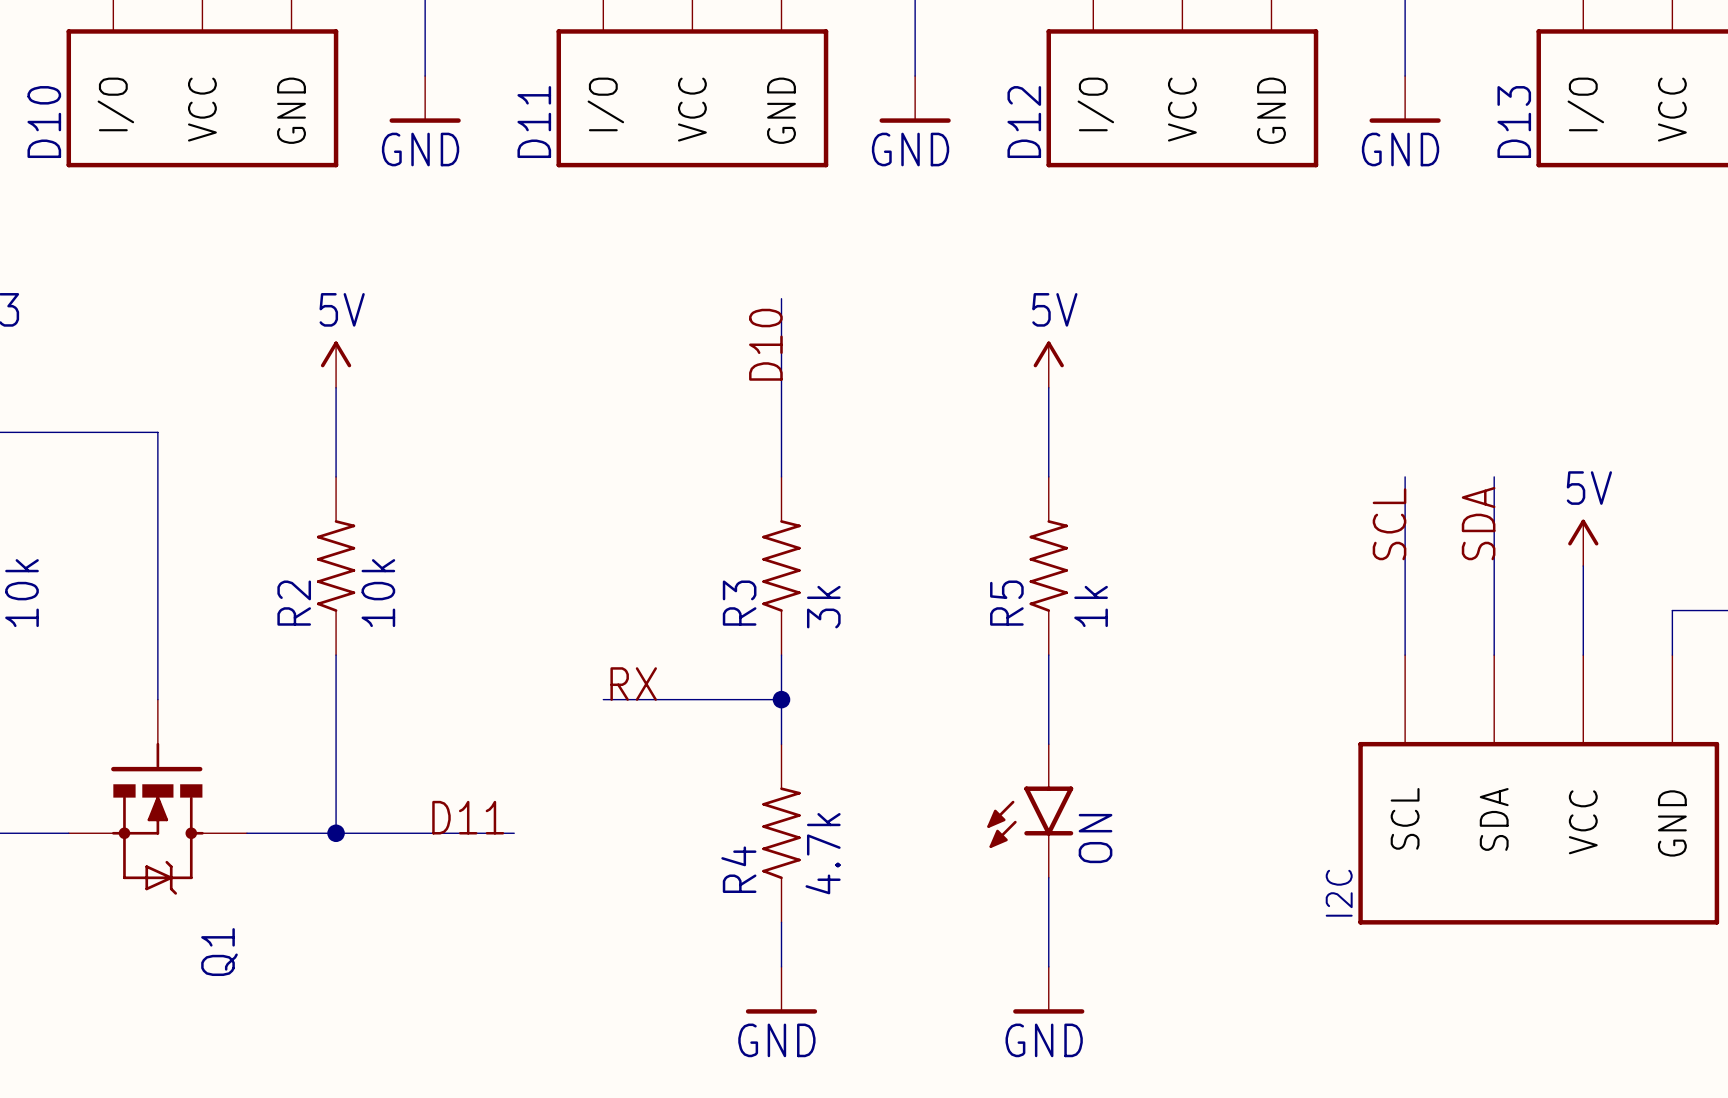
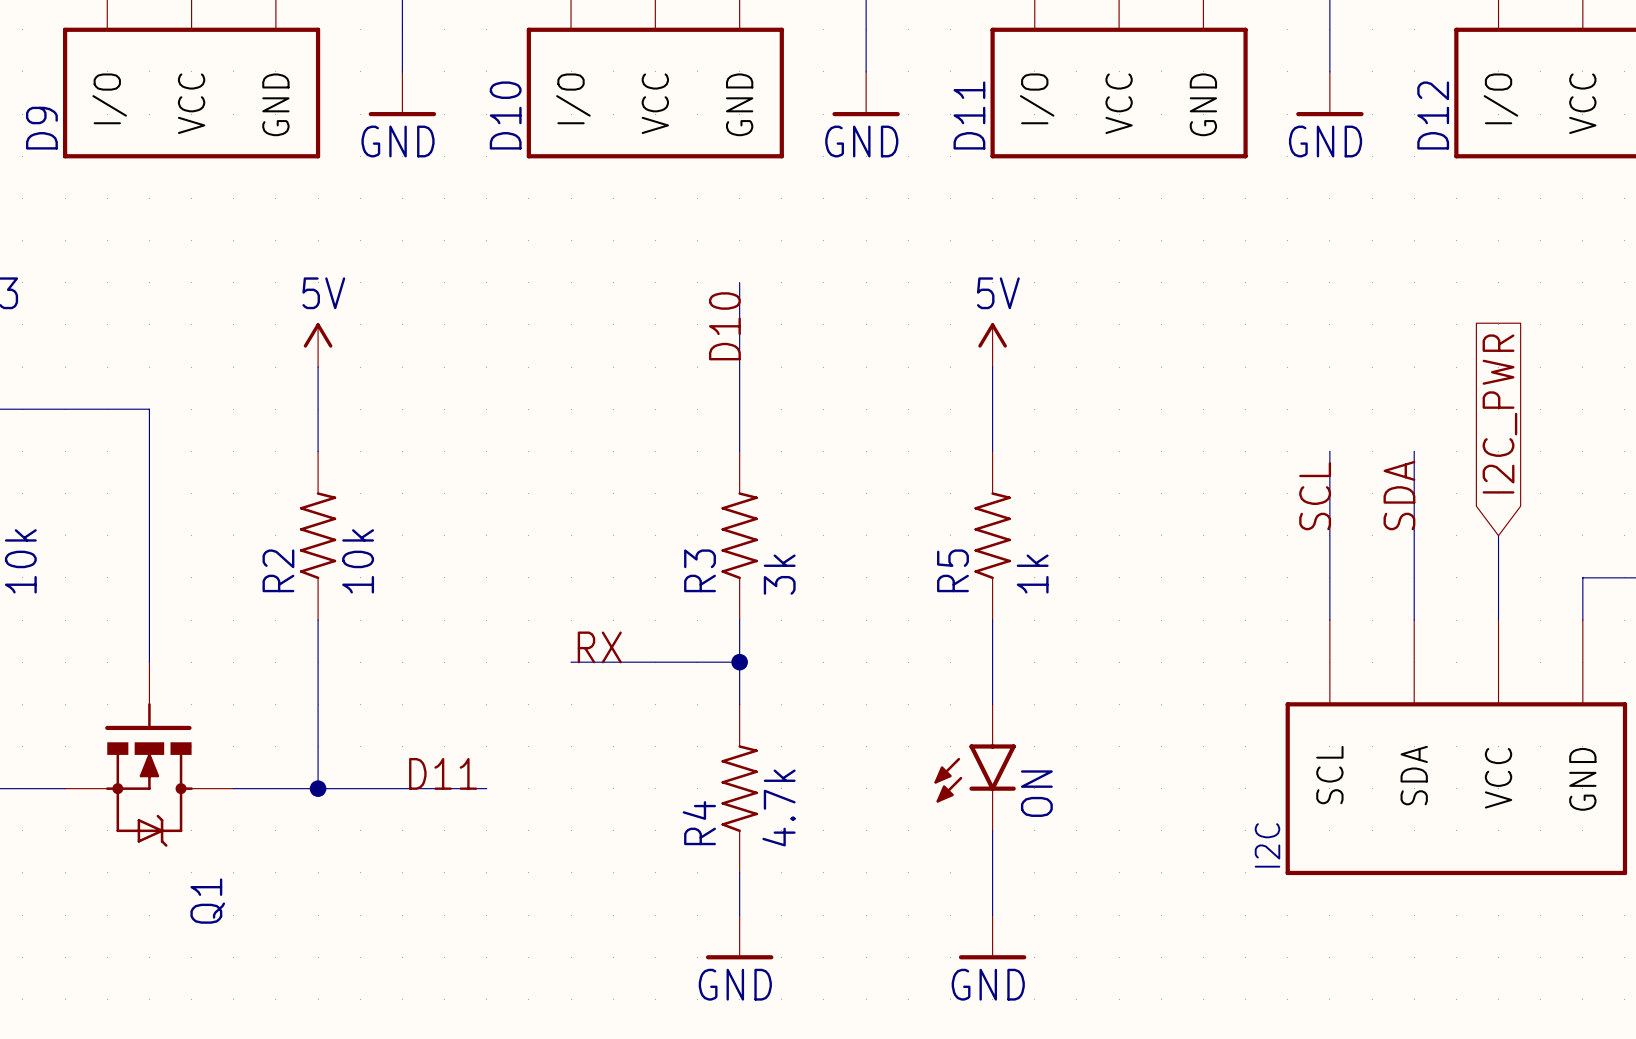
D10 name: D10 (44, 122) -> D9 (41, 128)
D11 name: D11 (534, 122) -> D10 (505, 115)
D12 name: D12 (1024, 122) -> D11 (969, 115)
D13 name: D13 (1514, 122) -> D12 (1433, 115)
global label: none -> I2C_PWR (1499, 413)
power symbol: 5V (1583, 542) -> none

